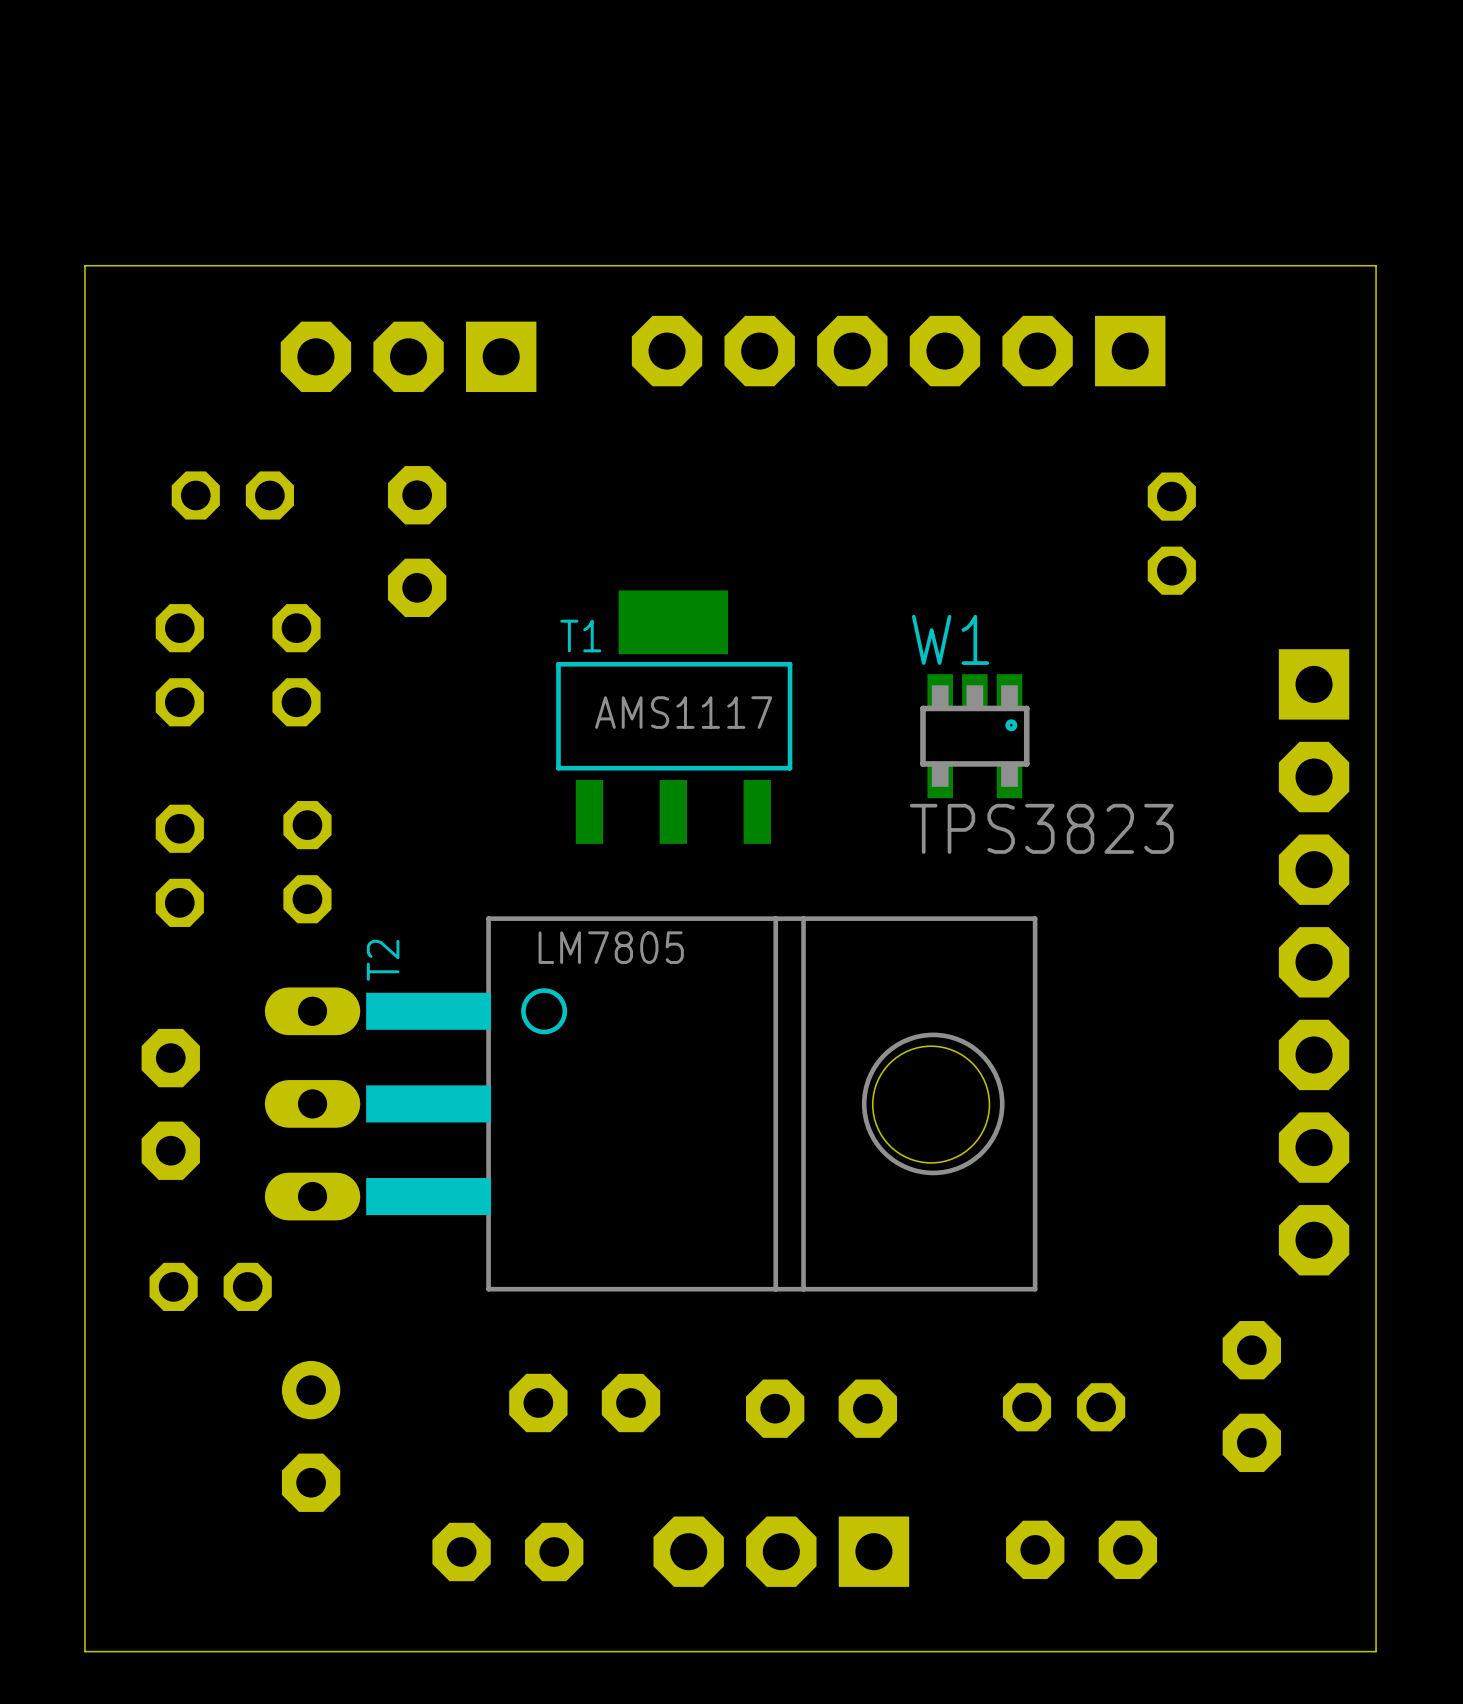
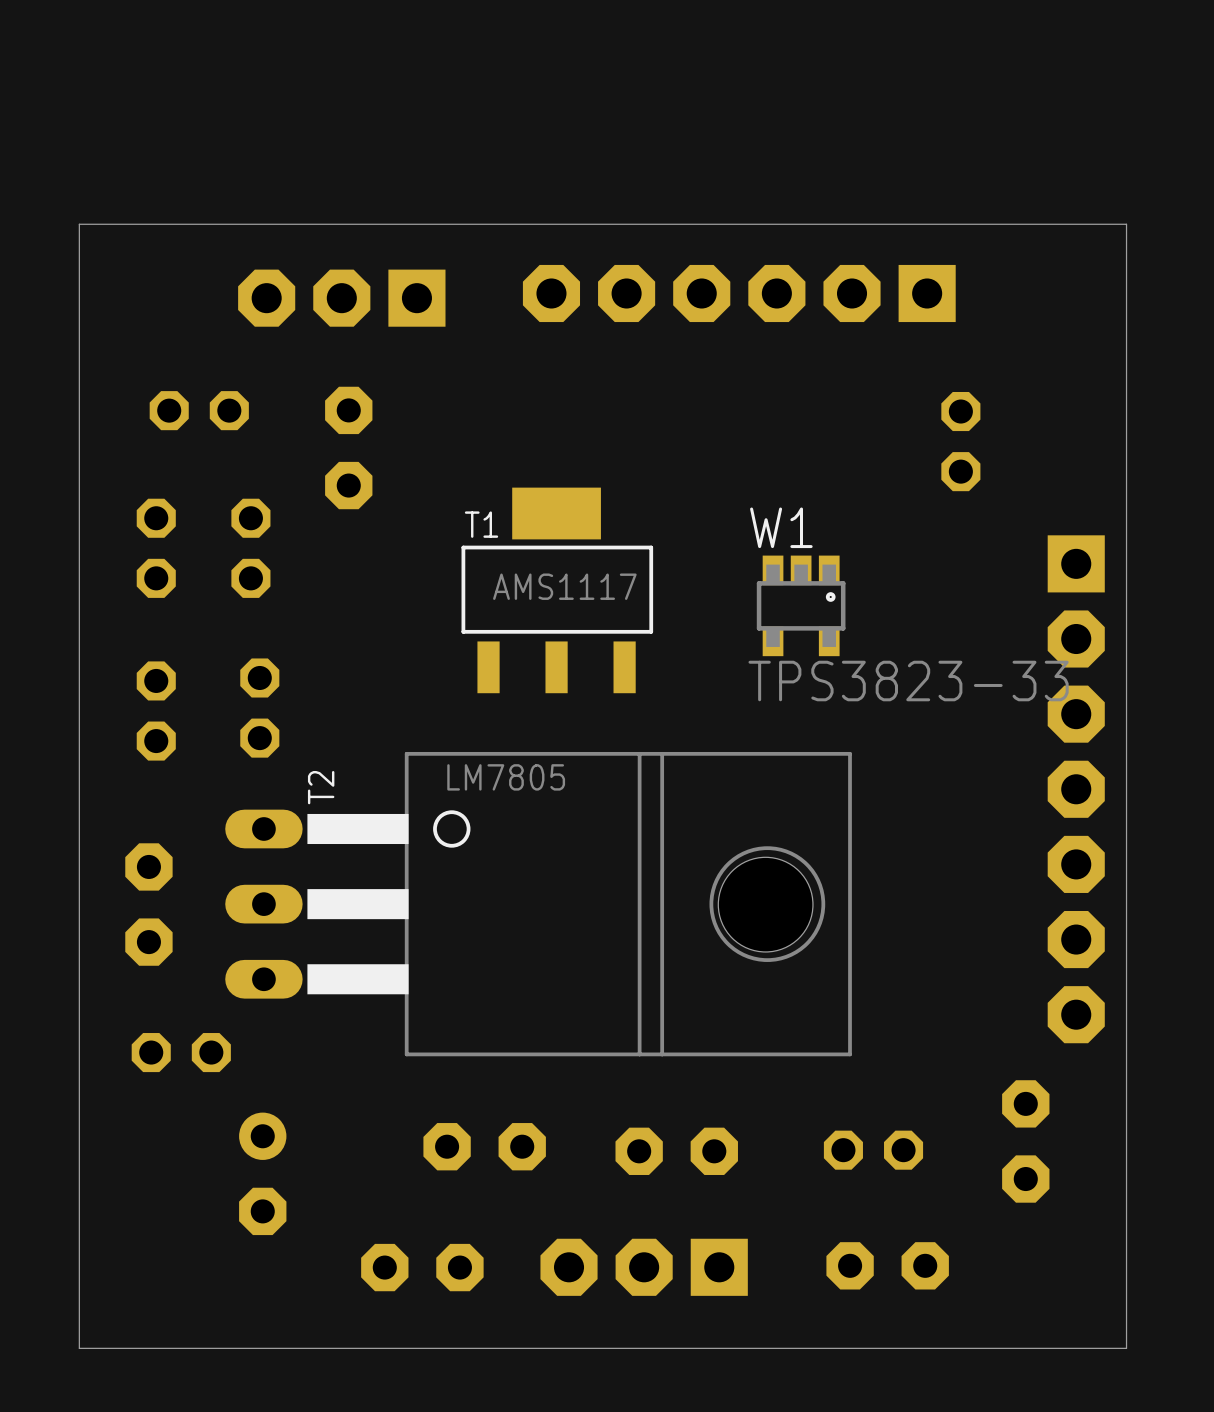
W1 value: TPS3823 (1041, 828) -> TPS3823-33 (908, 681)

